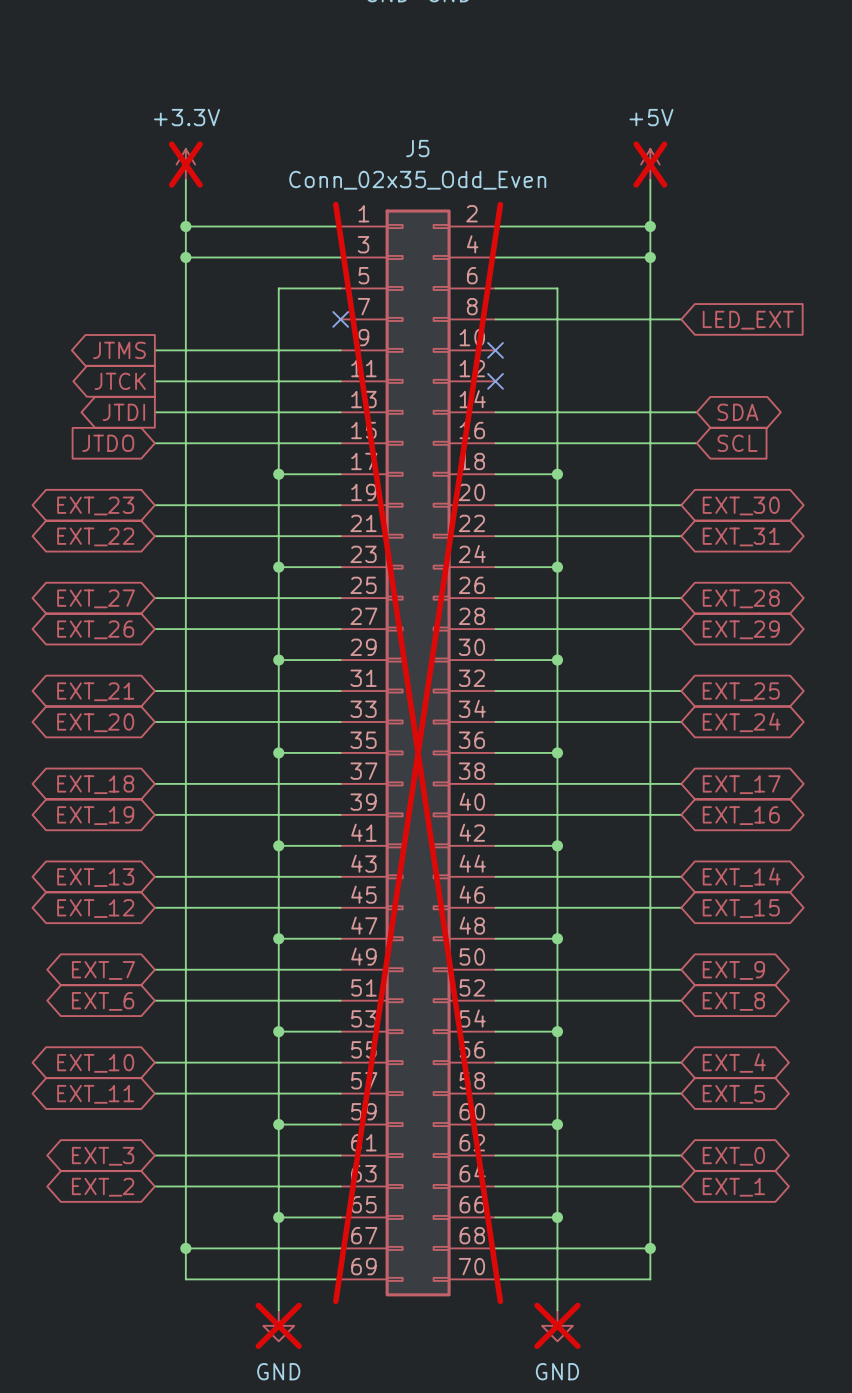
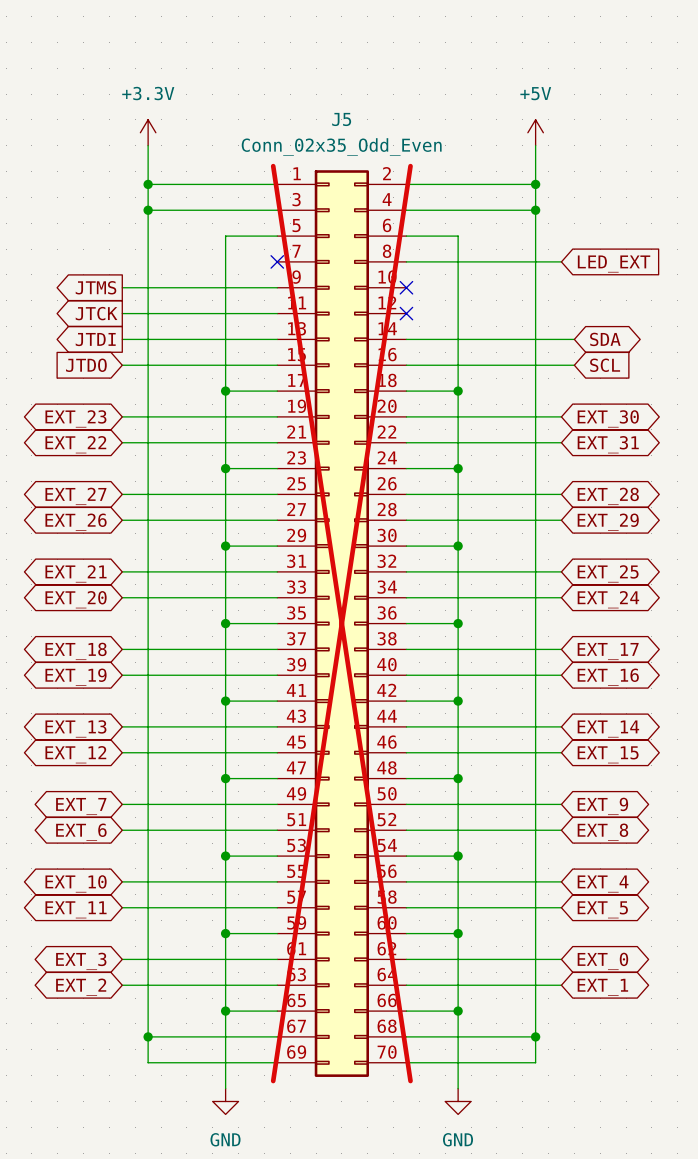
power symbol do-not-place cross: (185, 164) -> none
power symbol do-not-place cross: (650, 164) -> none
power symbol do-not-place cross: (278, 1325) -> none
power symbol do-not-place cross: (557, 1325) -> none

